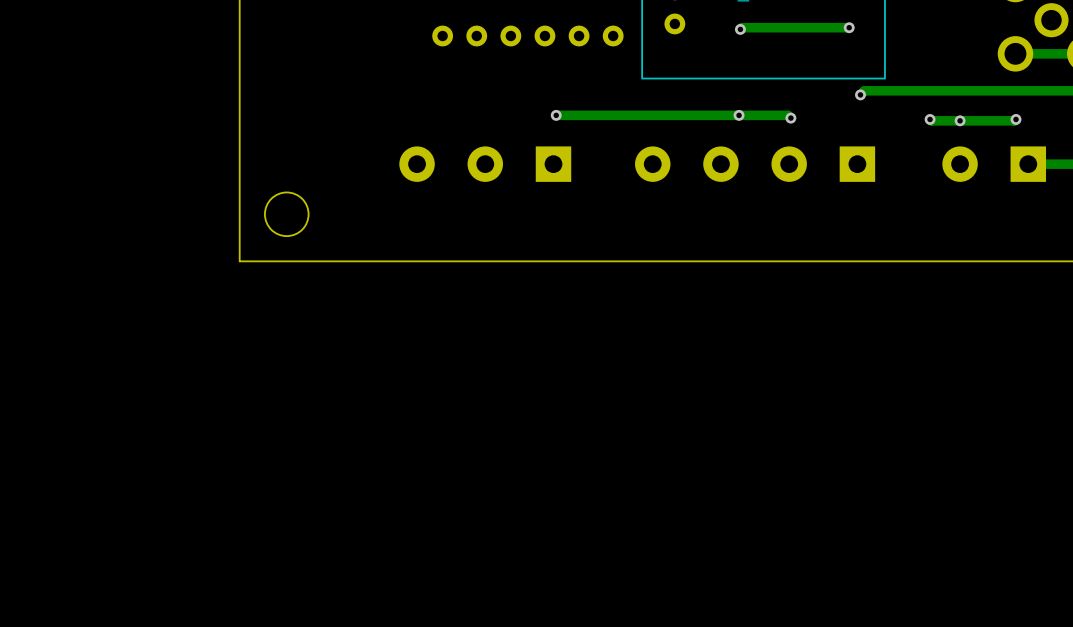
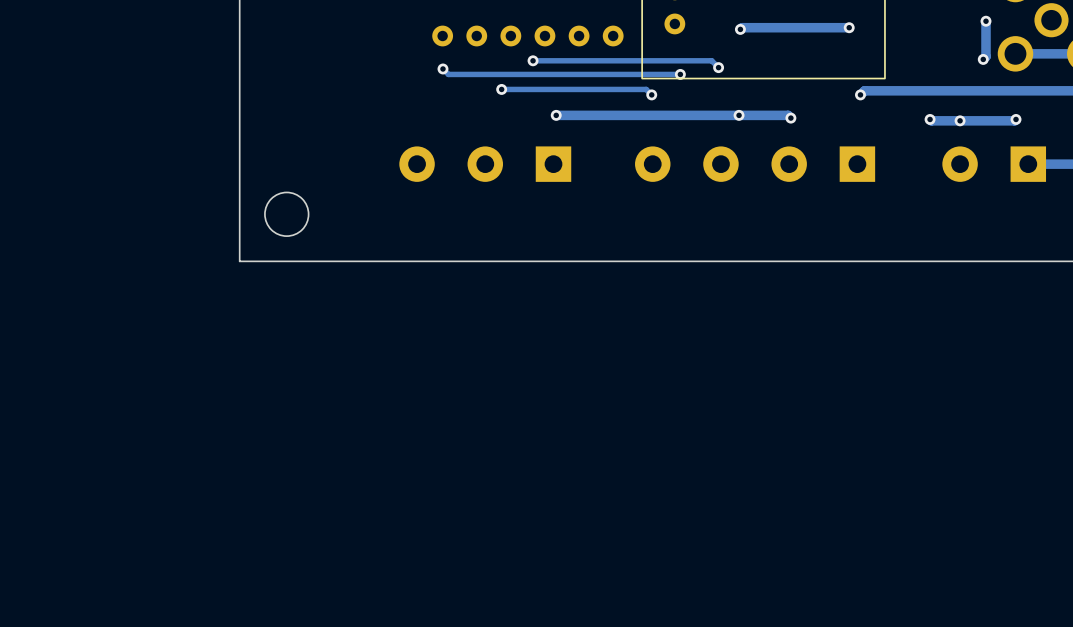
track: none -> (986, 21) (986, 56) (983, 59)
via: none -> (986, 21)
via: none -> (983, 59)
track: none -> (533, 60) (711, 60) (718, 67)
via: none -> (533, 60)
via: none -> (718, 67)
track: none -> (442, 68) (448, 74) (680, 74)
via: none -> (442, 68)
via: none -> (680, 74)
track: none -> (501, 89) (646, 89) (651, 94)
via: none -> (501, 89)
via: none -> (651, 94)

